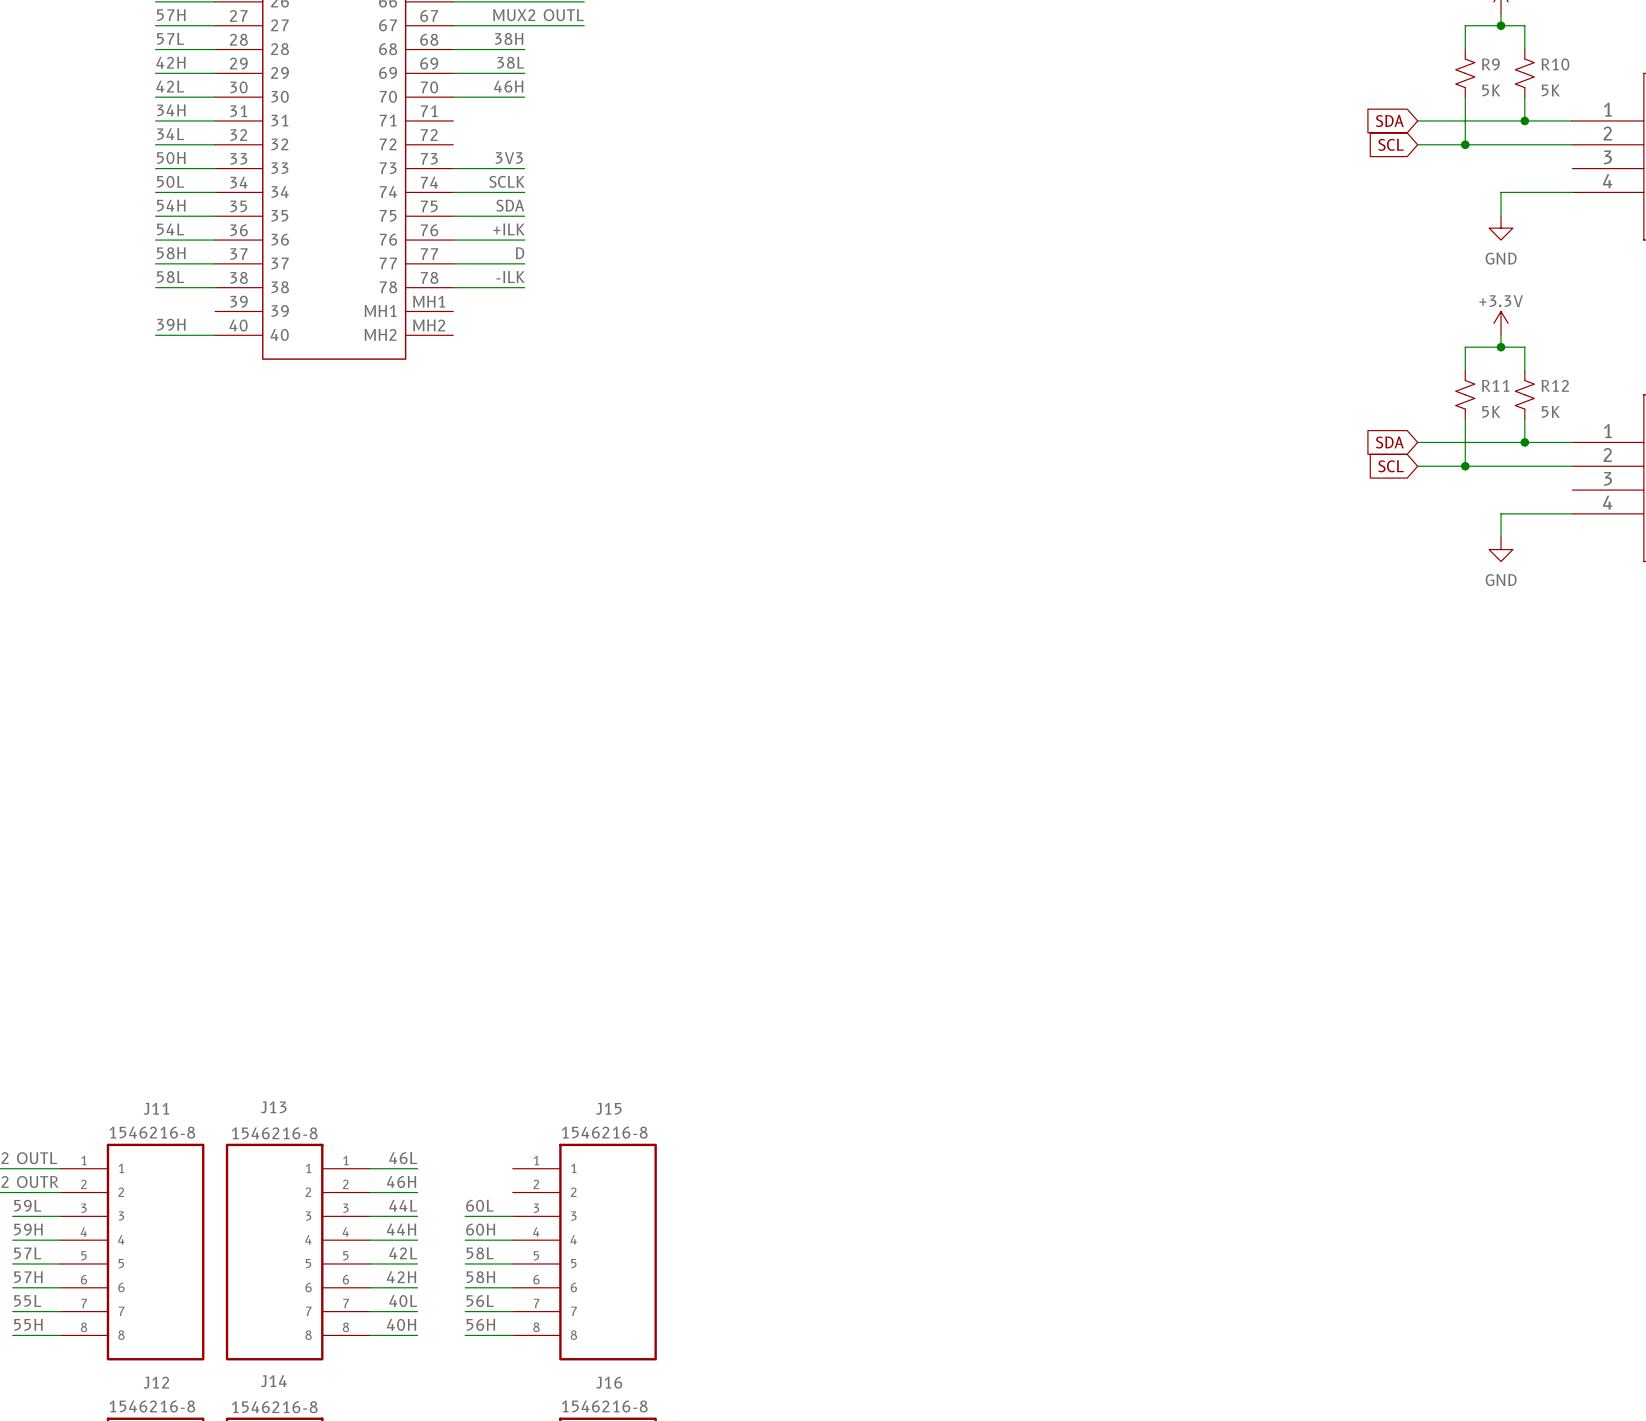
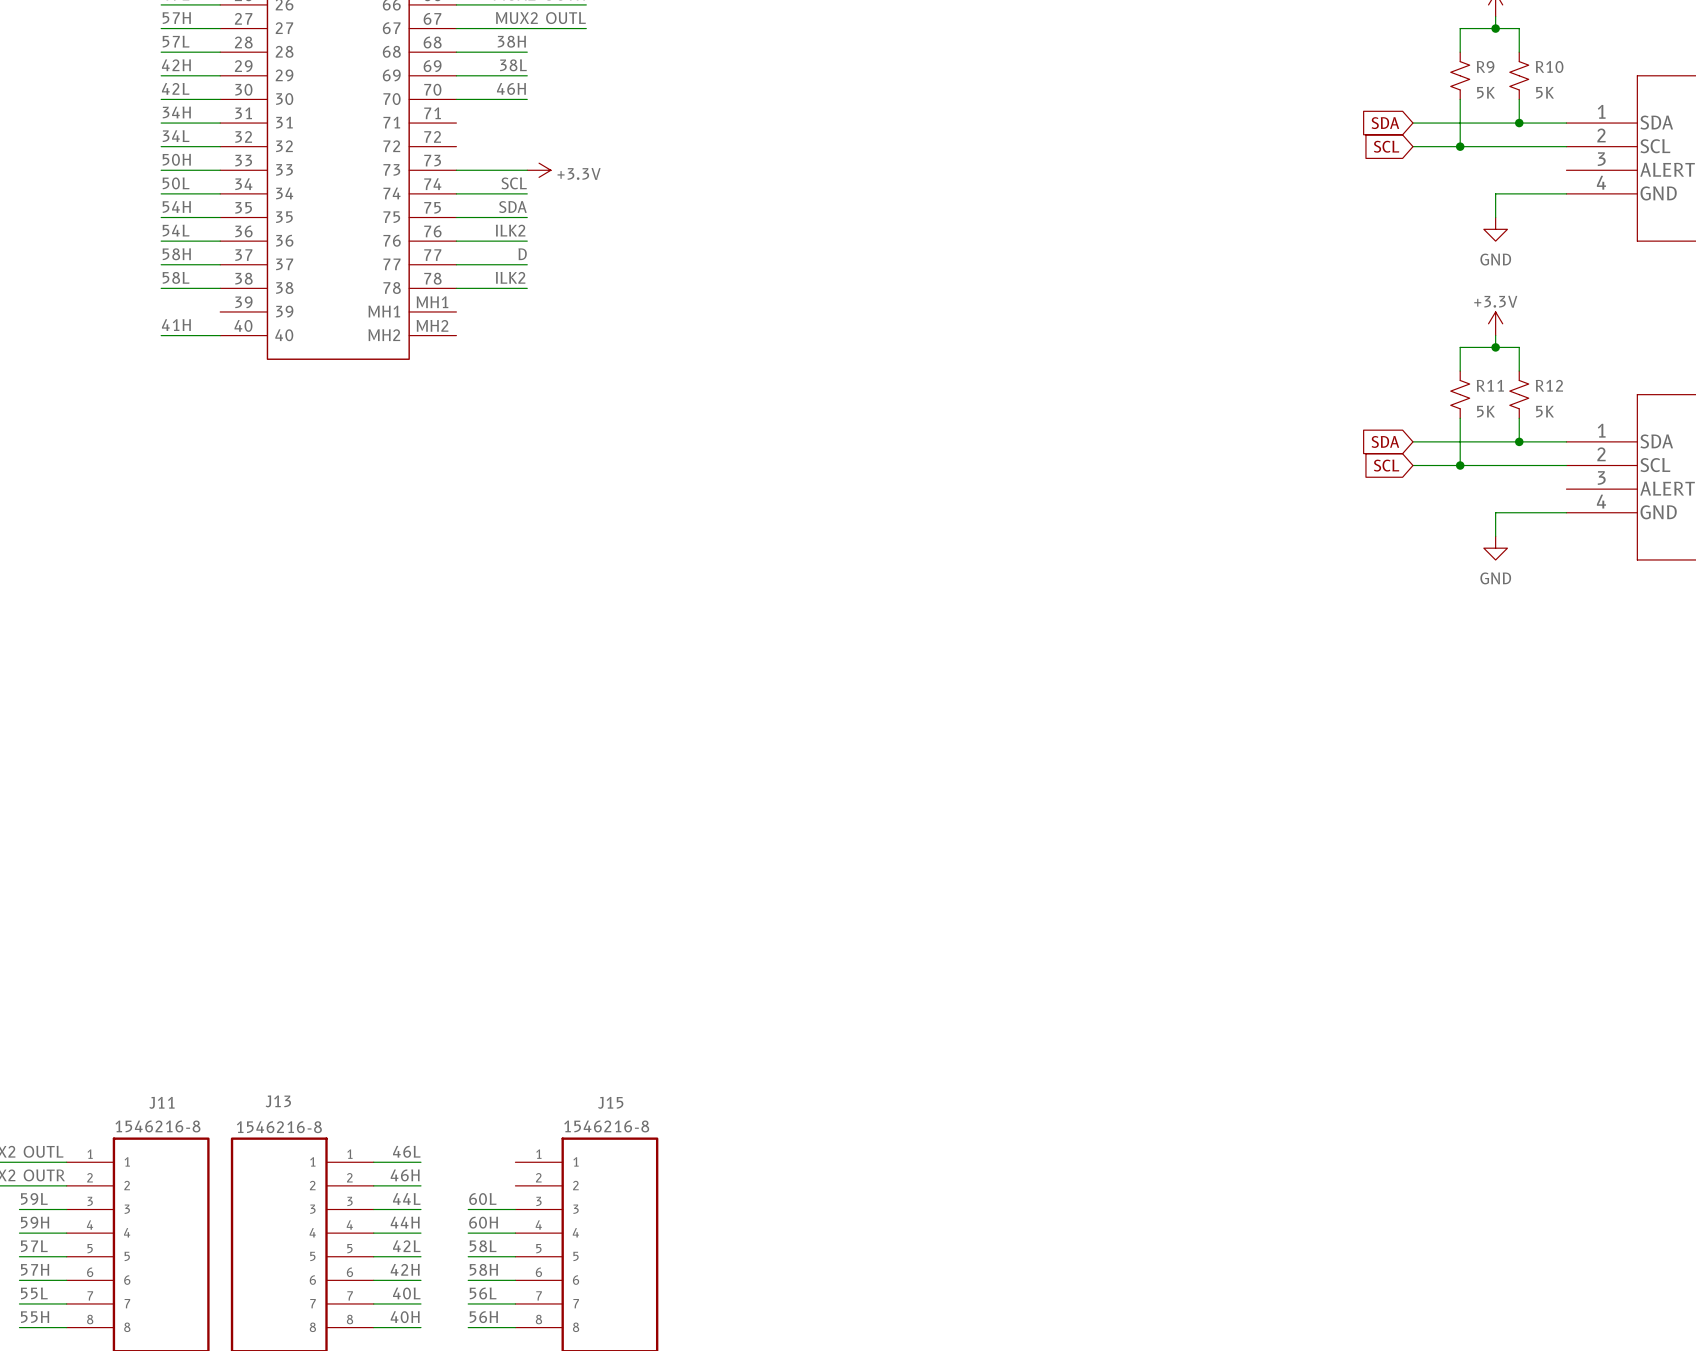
label: 3V3 (509, 158) -> none
power symbol: none -> +3.3V (539, 170)
label: SCLK (506, 181) -> SCL (514, 183)
label: +ILK (508, 229) -> ILK2 (510, 230)
label: -ILK (510, 277) -> ILK2 (510, 277)
label: 39H (171, 324) -> 41H (176, 325)

